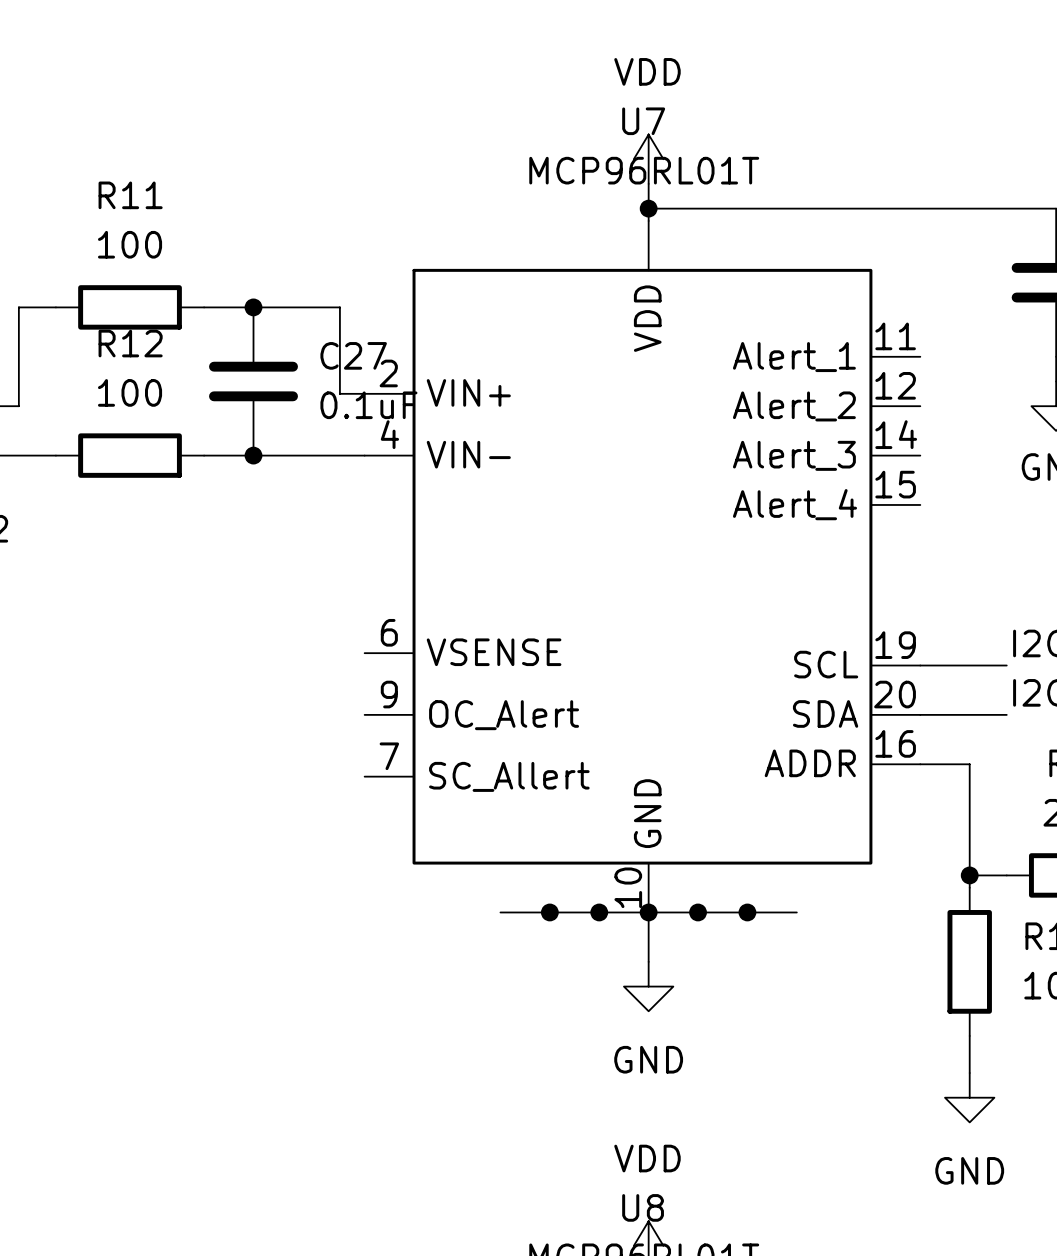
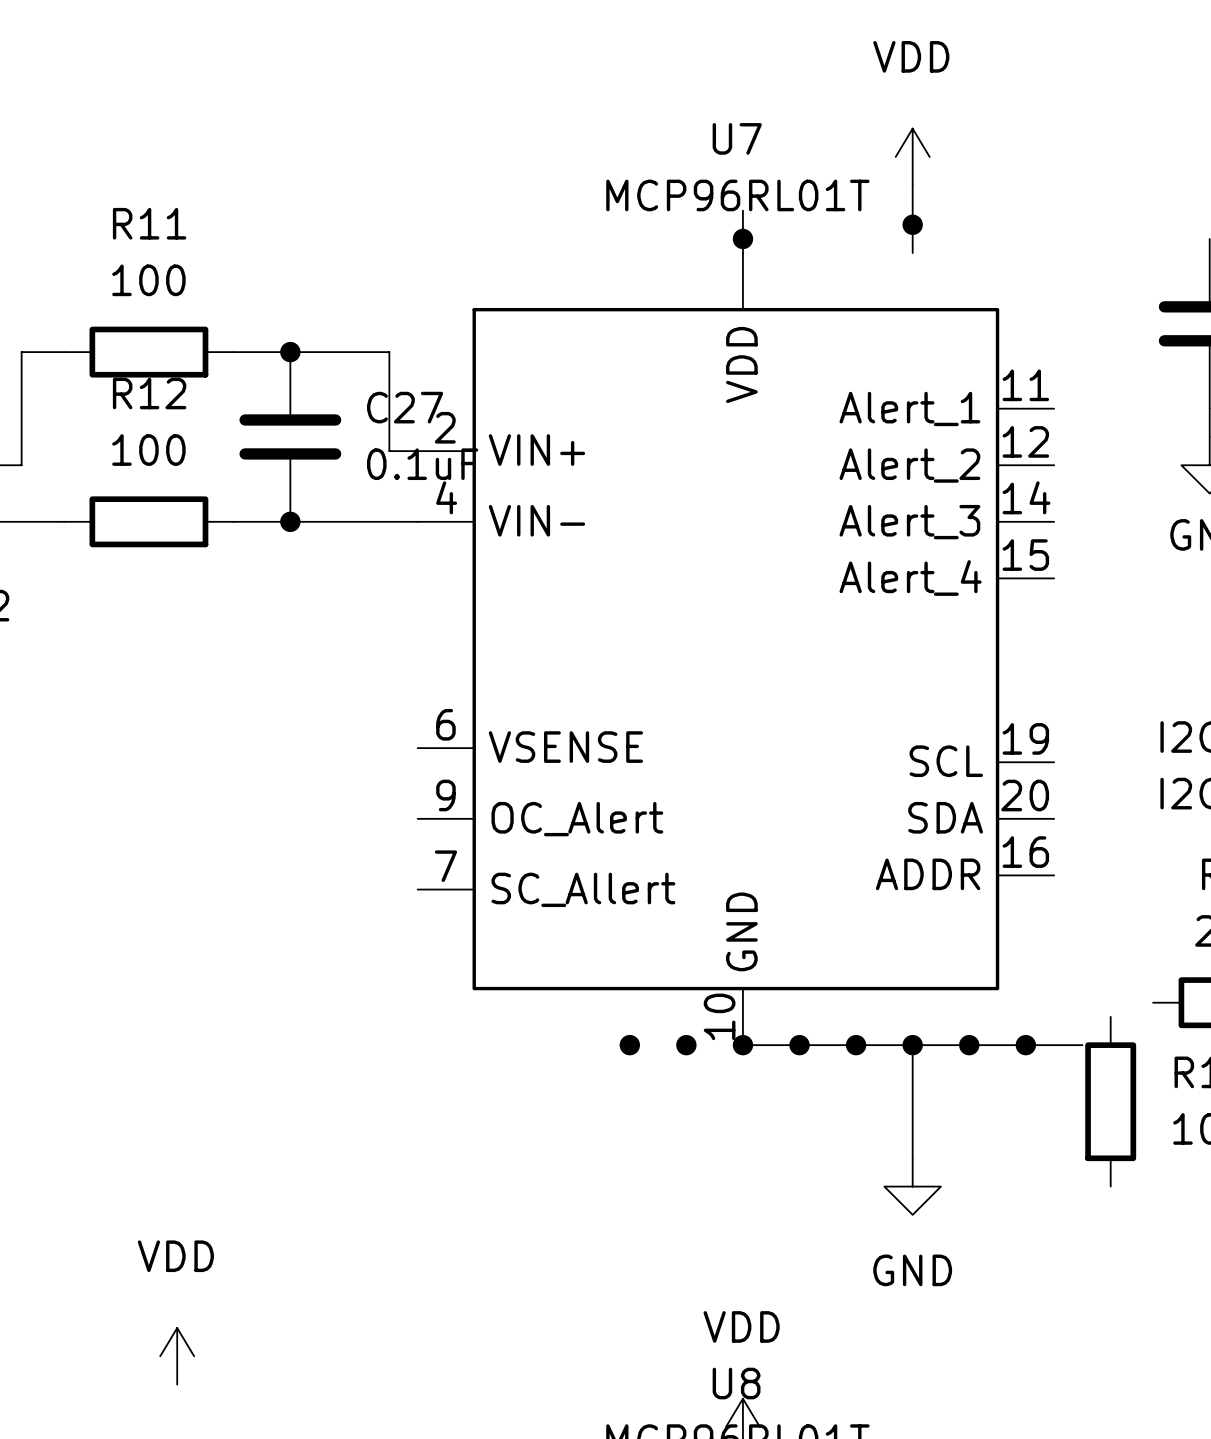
power symbol position: VDD (648, 159) -> VDD (912, 156)
wire: none -> (912, 185) (912, 253)
junction: none -> (912, 224)
wire: (648, 208) (1056, 208) -> none
wire: (920, 665) (1006, 665) -> none
wire: (920, 714) (1006, 714) -> none
wire: (920, 764) (969, 764) (969, 887) -> none
wire: (969, 875) (1006, 875) -> none
junction: (969, 875) -> none
wire: (500, 912) (648, 912) (648, 961) -> none
junction: none -> (912, 1045)
junction: none -> (969, 1045)
junction: none -> (1025, 1045)
wire: none -> (1082, 1045) (912, 1045) (912, 1158)
power symbol: GND (648, 986) -> none
power symbol: none -> GND (912, 1186)
wire: (969, 1035) (969, 1073) -> none
power symbol: GND (969, 1097) -> none
power symbol: none -> VDD (177, 1356)

